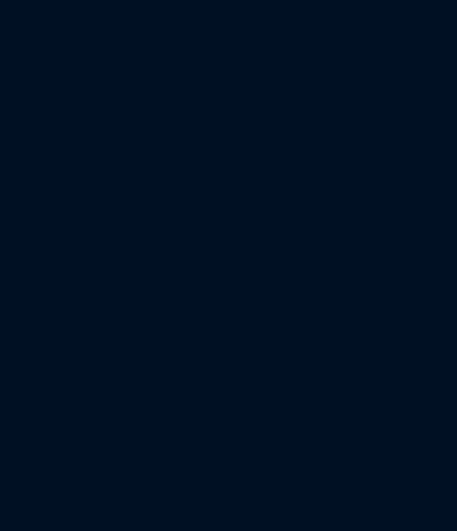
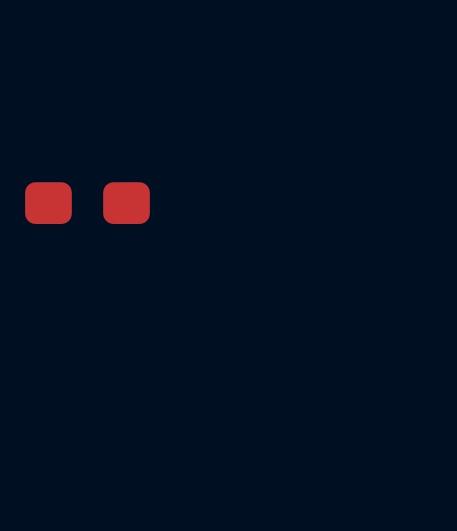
part: none -> (87, 203)

